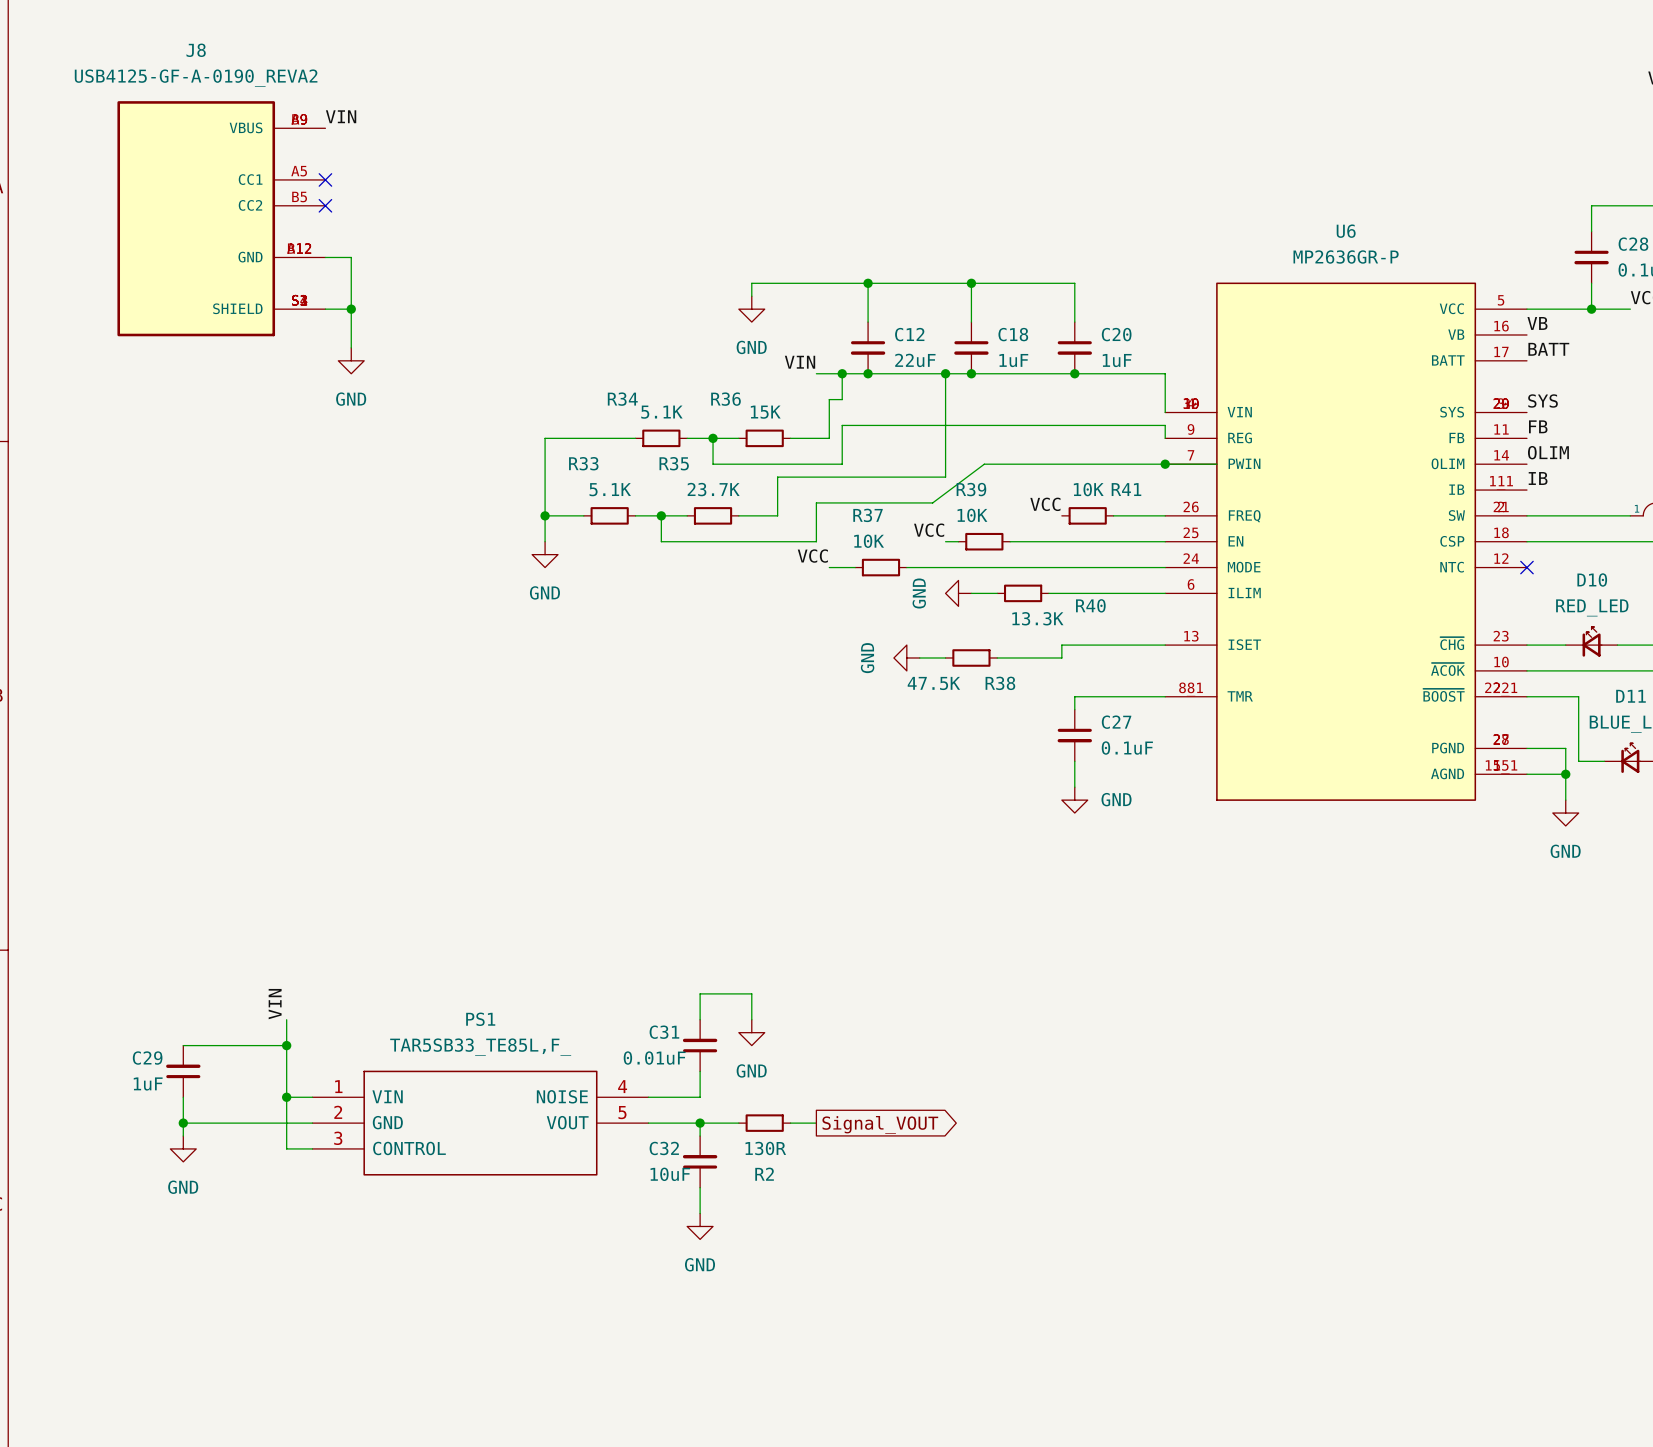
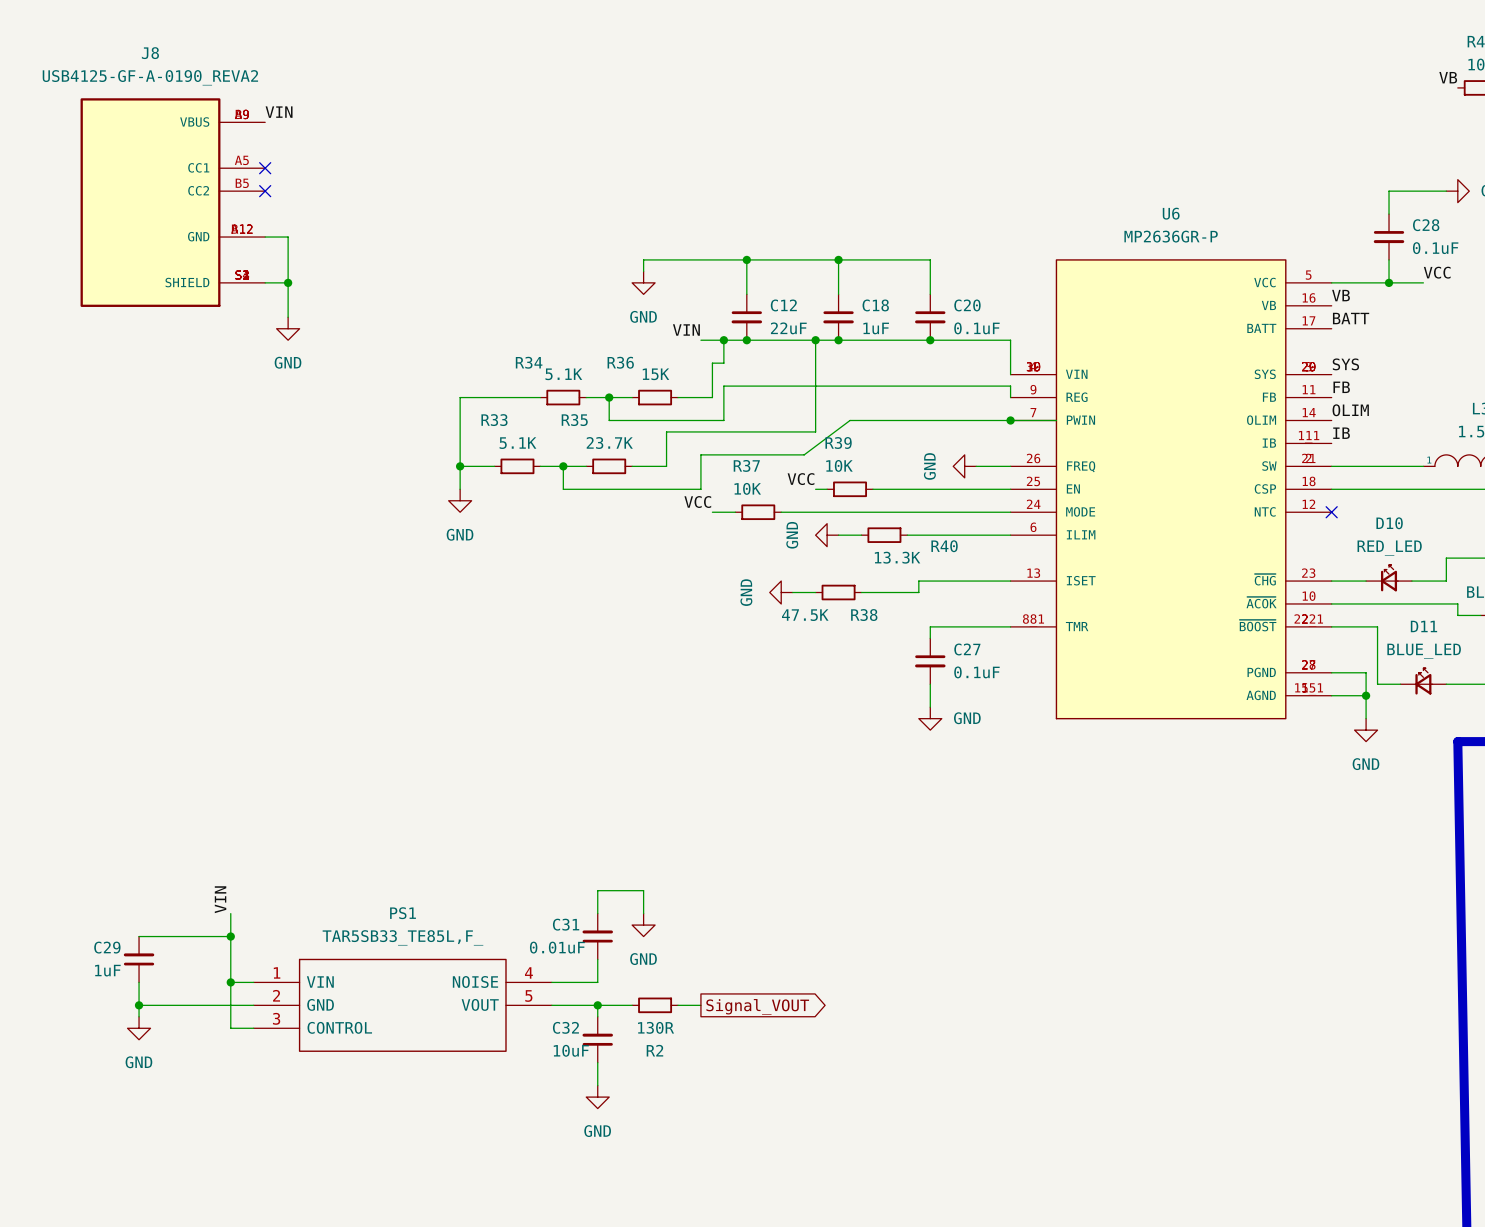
C20 value: 1uF (1117, 360) -> 0.1uF (976, 328)
label: VCC (1045, 504) -> none
R41: 10K (1087, 515) -> none
power symbol: none -> GND (964, 466)

